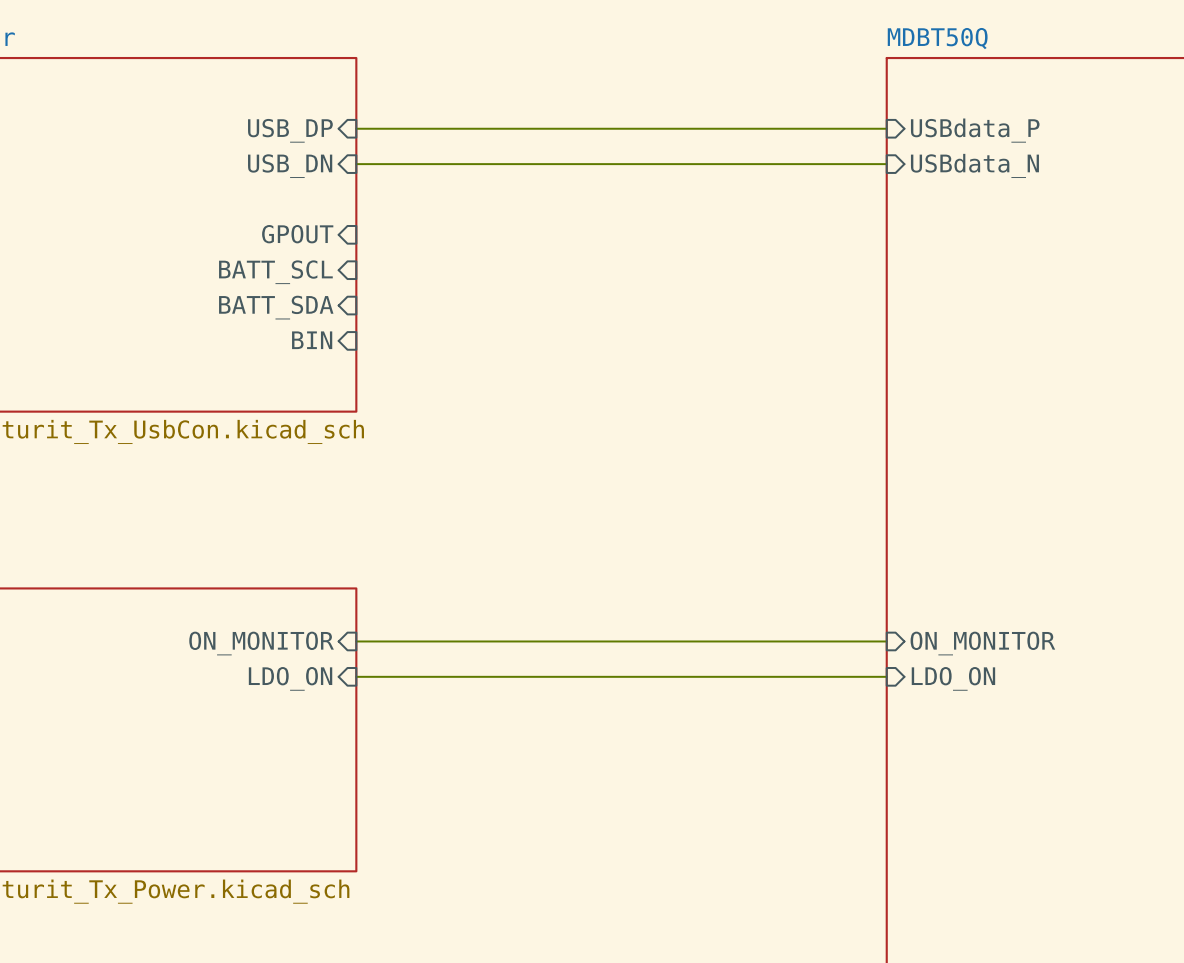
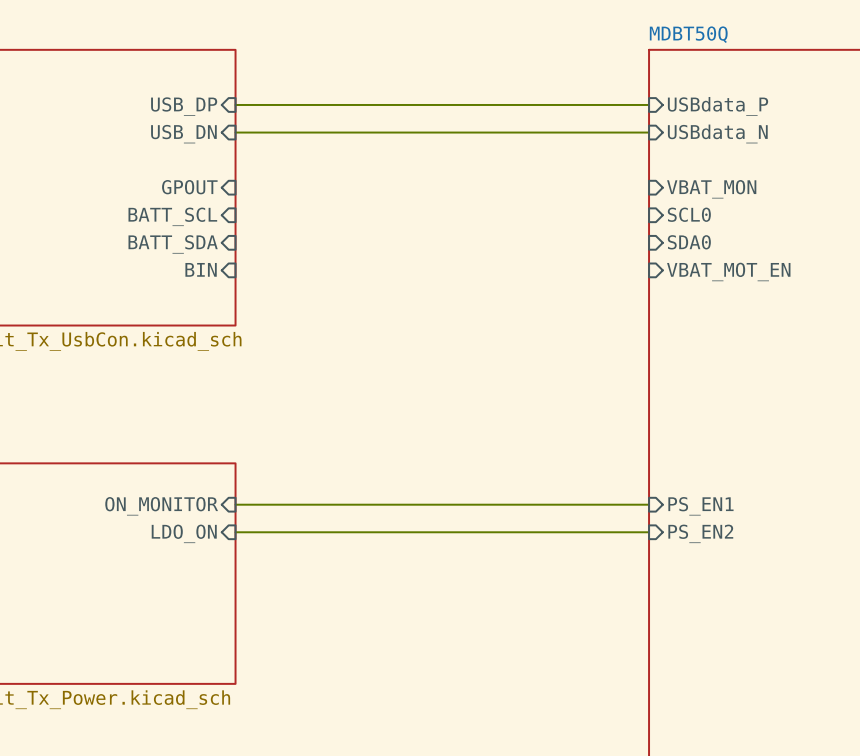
sheet pin: none -> VBAT_MON (711, 189)
sheet pin: none -> SCL0 (689, 214)
sheet pin: none -> SDA0 (689, 242)
sheet pin: none -> VBAT_MOT_EN (728, 271)
sheet pin: ON_MONITOR (982, 643) -> PS_EN1 (700, 506)
sheet pin: LDO_ON (953, 678) -> PS_EN2 (700, 533)

